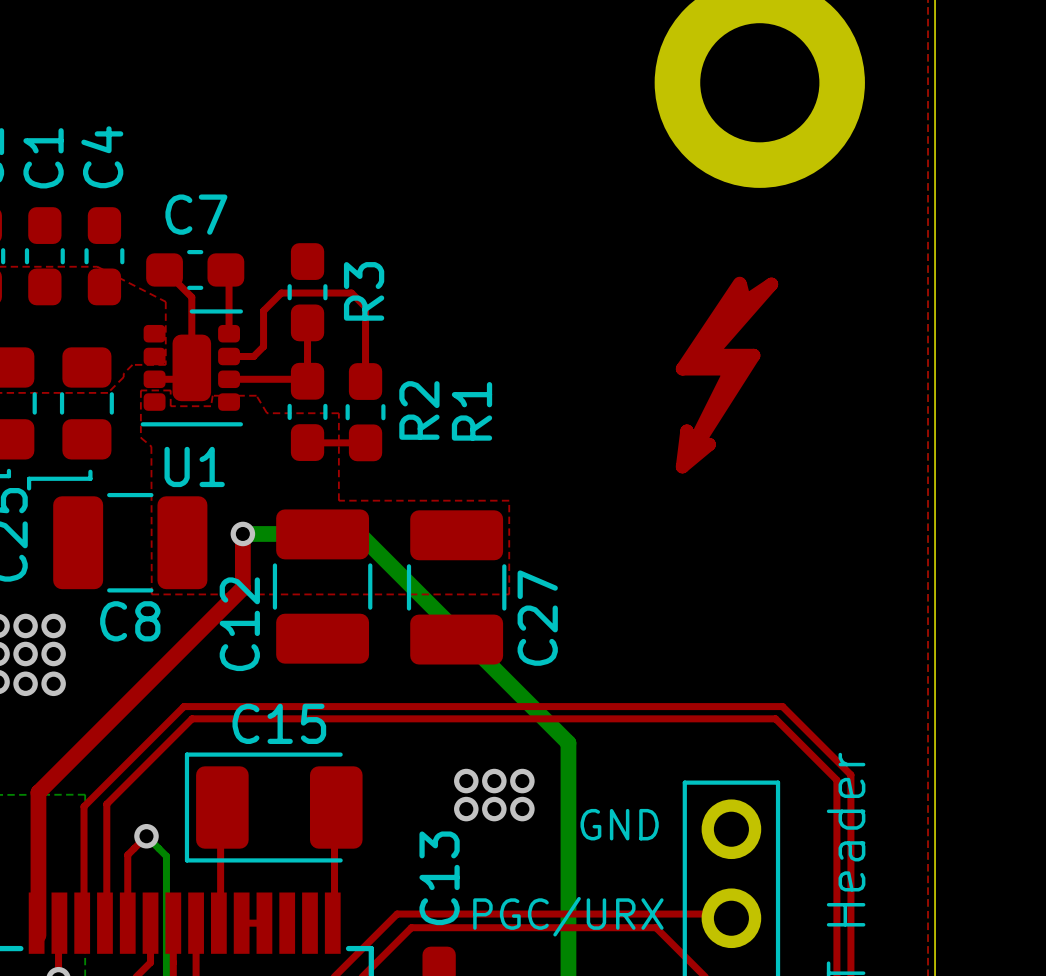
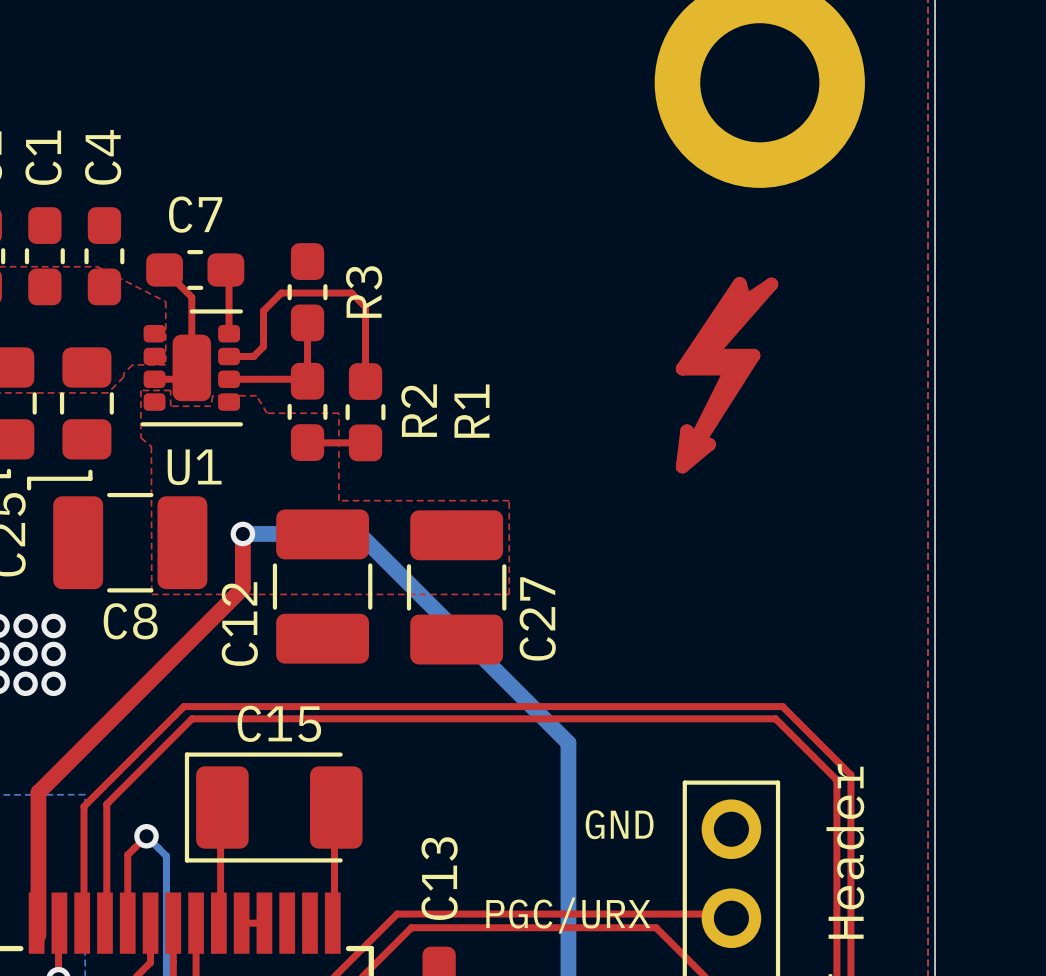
via: (466, 781) -> none
via: (494, 781) -> none
via: (522, 781) -> none
via: (466, 809) -> none
via: (494, 809) -> none
via: (522, 809) -> none

